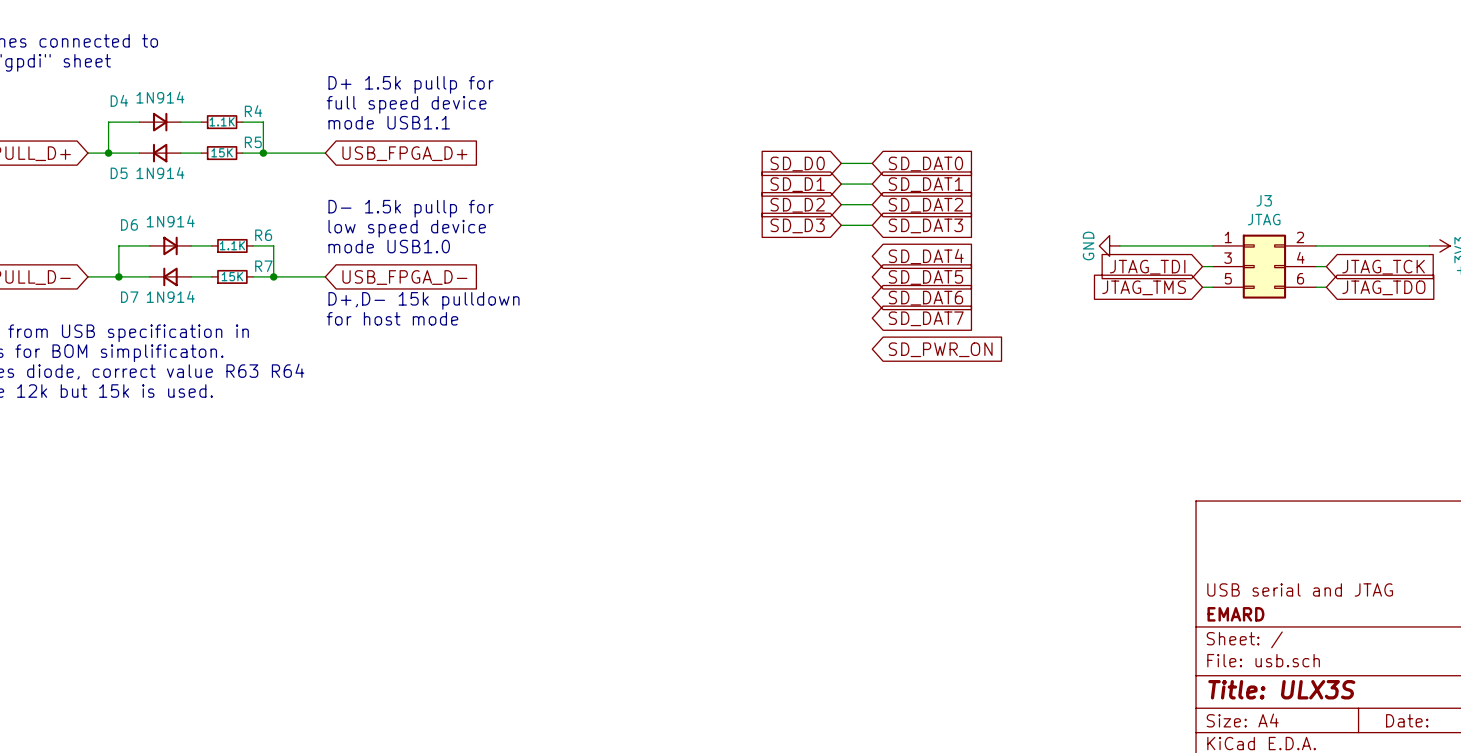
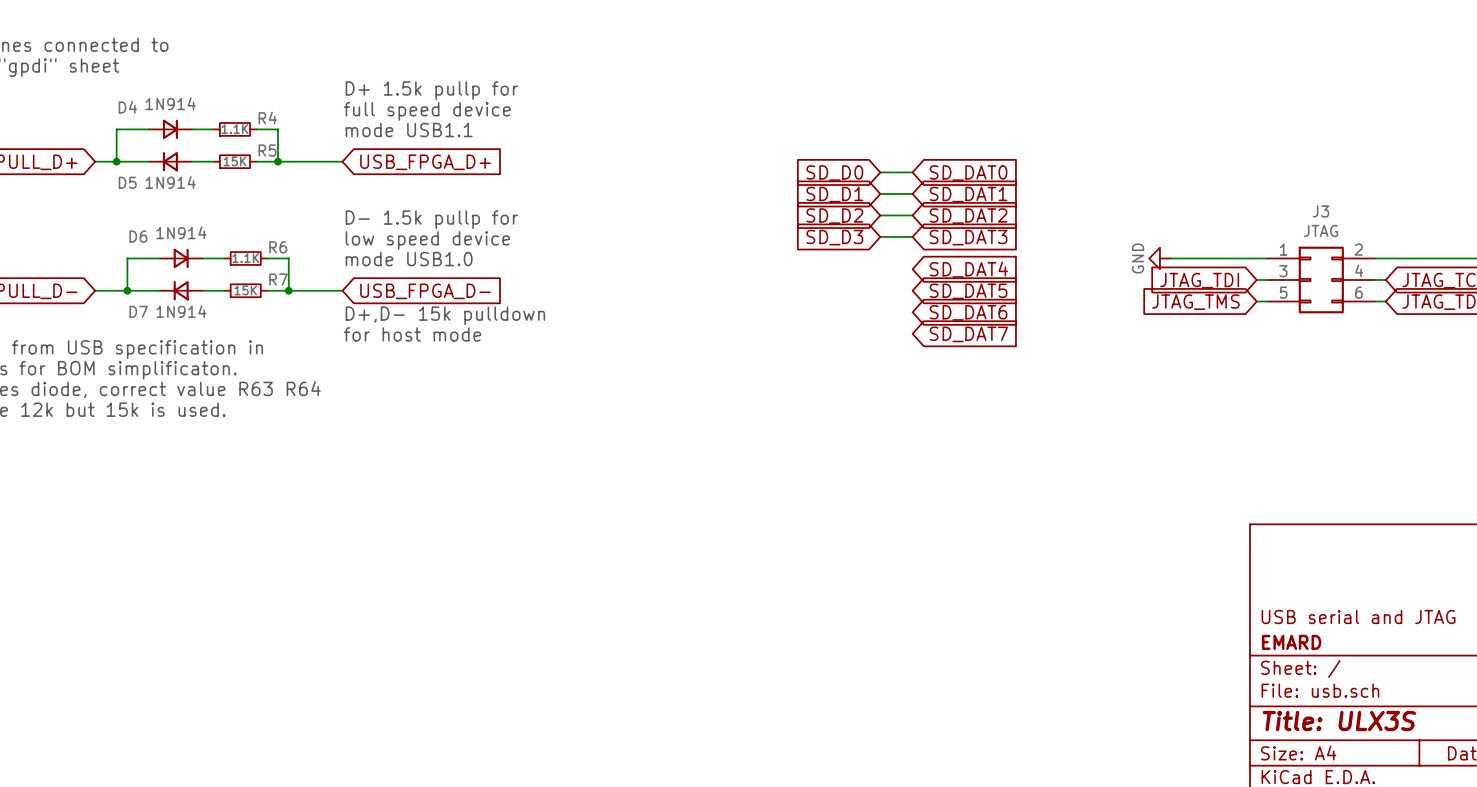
global label: SD_PWR_ON (940, 349) -> none

